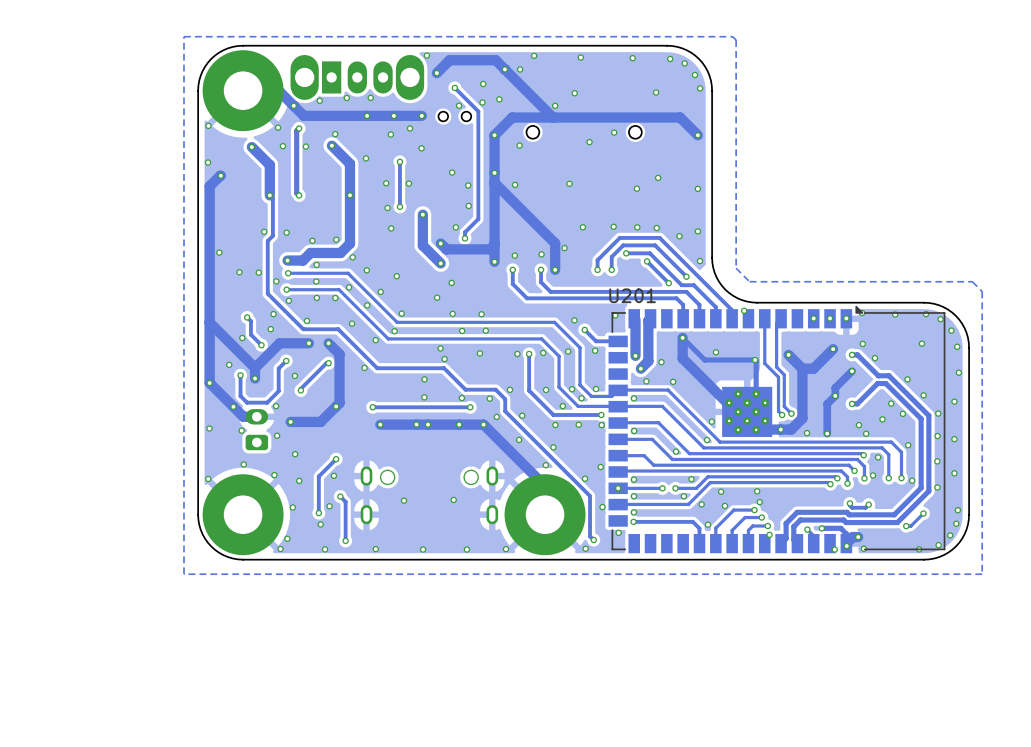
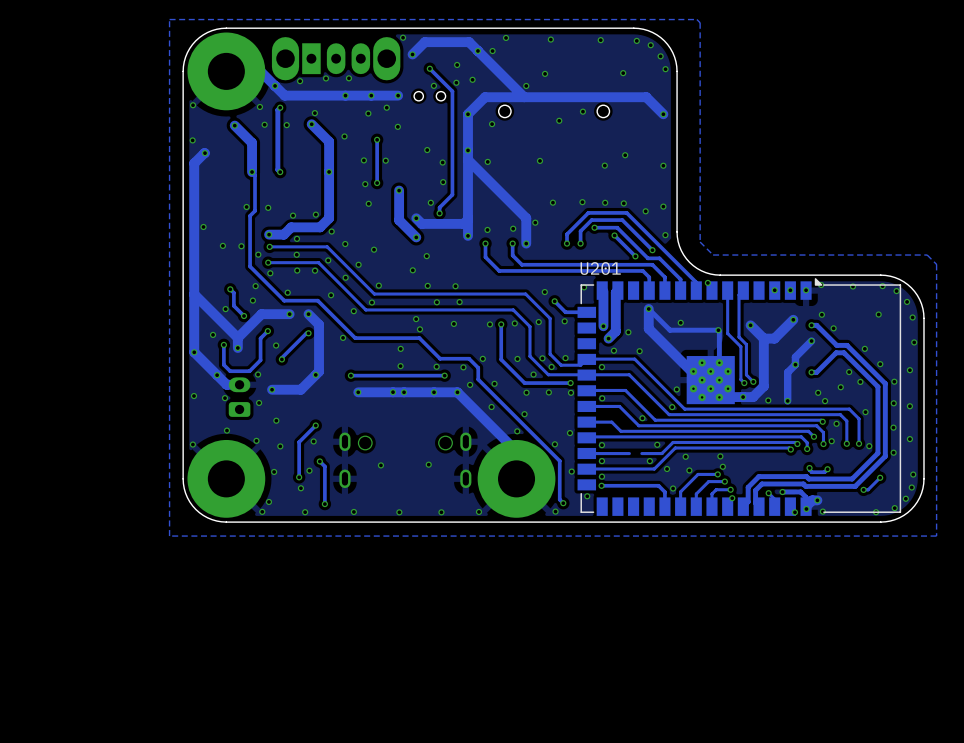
via: (618, 488) -> none
via: (662, 488) -> none
via: (675, 488) -> none

